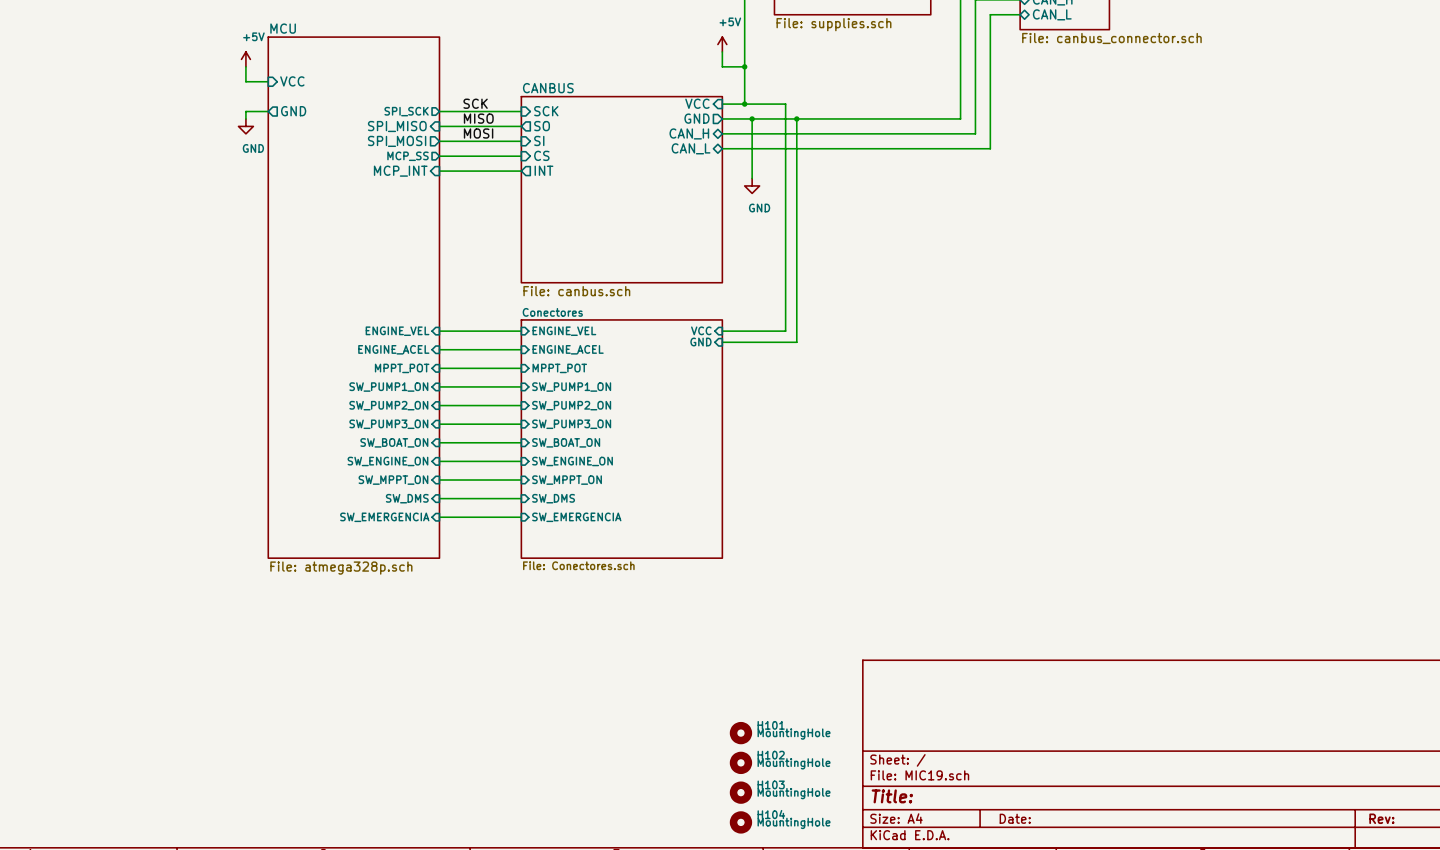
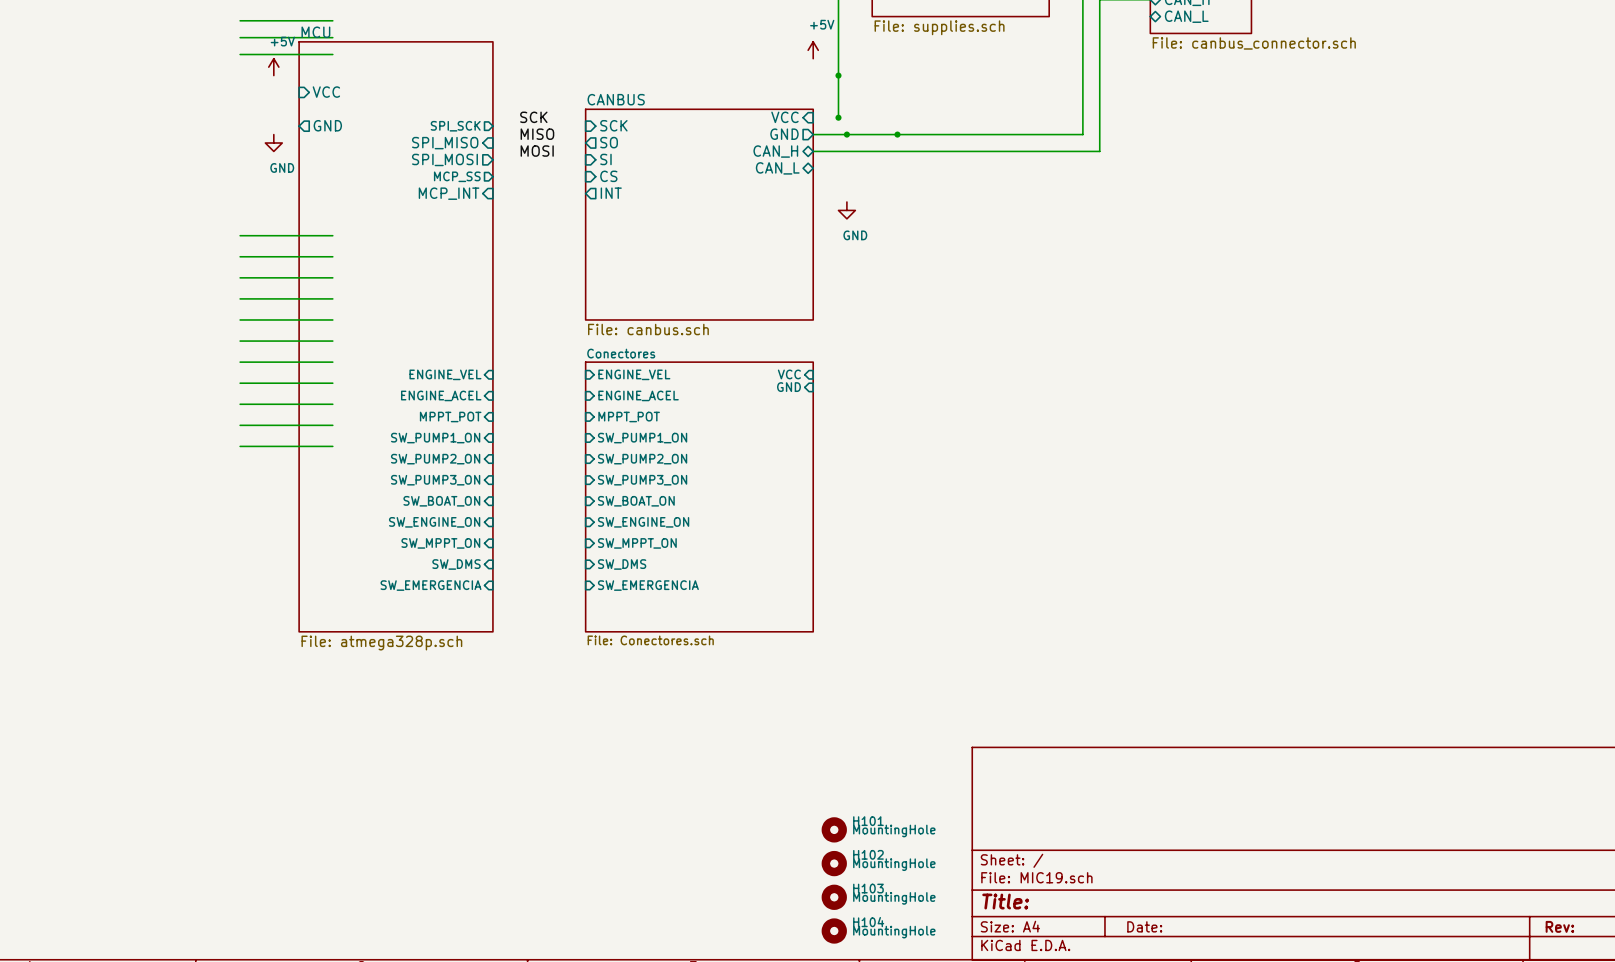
wire: (1020, 14) (990, 14) (990, 148) (722, 148) -> none
wire: none -> (240, 20) (332, 20)
wire: none -> (240, 37) (332, 37)
wire: none -> (240, 54) (332, 54)
wire: (722, 51) (722, 66) (744, 66) -> none
wire: (245, 66) (245, 81) (268, 81) -> none
wire: (722, 104) (785, 104) (785, 331) (722, 331) -> none
wire: (268, 111) (245, 111) (245, 118) -> none
wire: (439, 111) (521, 111) -> none
wire: (752, 118) (752, 178) -> none
wire: (796, 118) (796, 342) (722, 342) -> none
wire: (439, 126) (521, 126) -> none
wire: (439, 141) (521, 141) -> none
wire: (439, 156) (521, 156) -> none
wire: (439, 171) (521, 171) -> none
wire: none -> (240, 235) (332, 235)
wire: none -> (240, 256) (332, 256)
wire: none -> (240, 277) (332, 277)
wire: none -> (240, 298) (332, 298)
wire: none -> (240, 319) (332, 319)
wire: none -> (240, 341) (332, 341)
wire: none -> (240, 362) (332, 362)
wire: (439, 331) (521, 331) -> none
wire: none -> (240, 383) (332, 383)
wire: (439, 349) (521, 349) -> none
wire: none -> (240, 404) (332, 404)
wire: (439, 368) (521, 368) -> none
wire: none -> (240, 425) (332, 425)
wire: (439, 386) (521, 386) -> none
wire: none -> (240, 446) (332, 446)
wire: (439, 405) (521, 405) -> none
wire: (439, 424) (521, 424) -> none
wire: (439, 442) (521, 442) -> none
wire: (439, 461) (521, 461) -> none
wire: (439, 480) (521, 480) -> none
wire: (439, 498) (521, 498) -> none
wire: (439, 517) (521, 517) -> none

